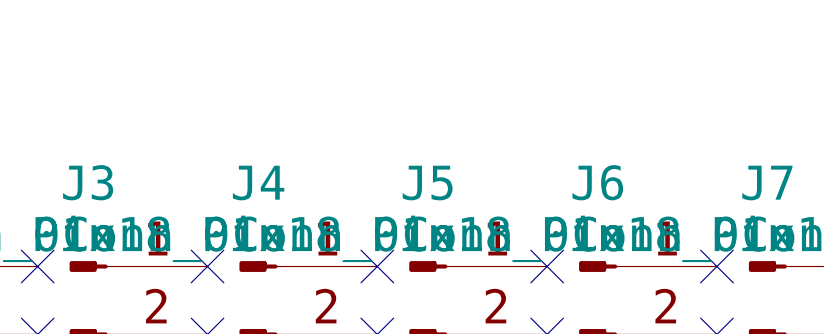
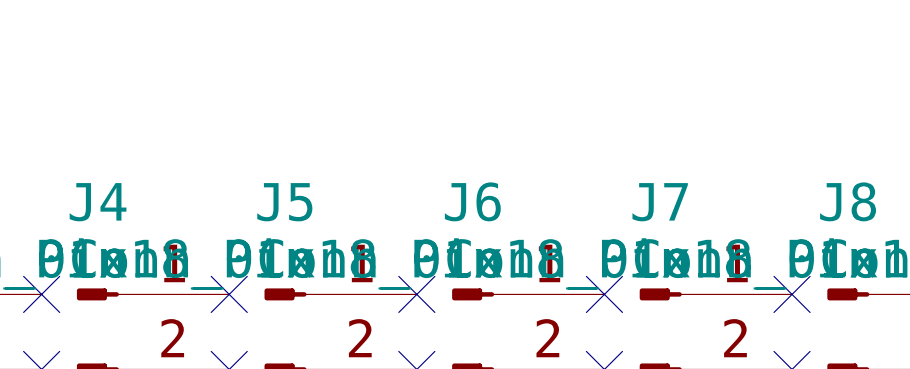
J3 name: J3 (88, 182) -> J4 (98, 202)
J6 name: J6 (597, 182) -> J7 (660, 202)
J4 name: J4 (258, 183) -> J5 (284, 202)
J5 name: J5 (427, 183) -> J6 (472, 201)
J7 name: J7 (767, 183) -> J8 (848, 201)

